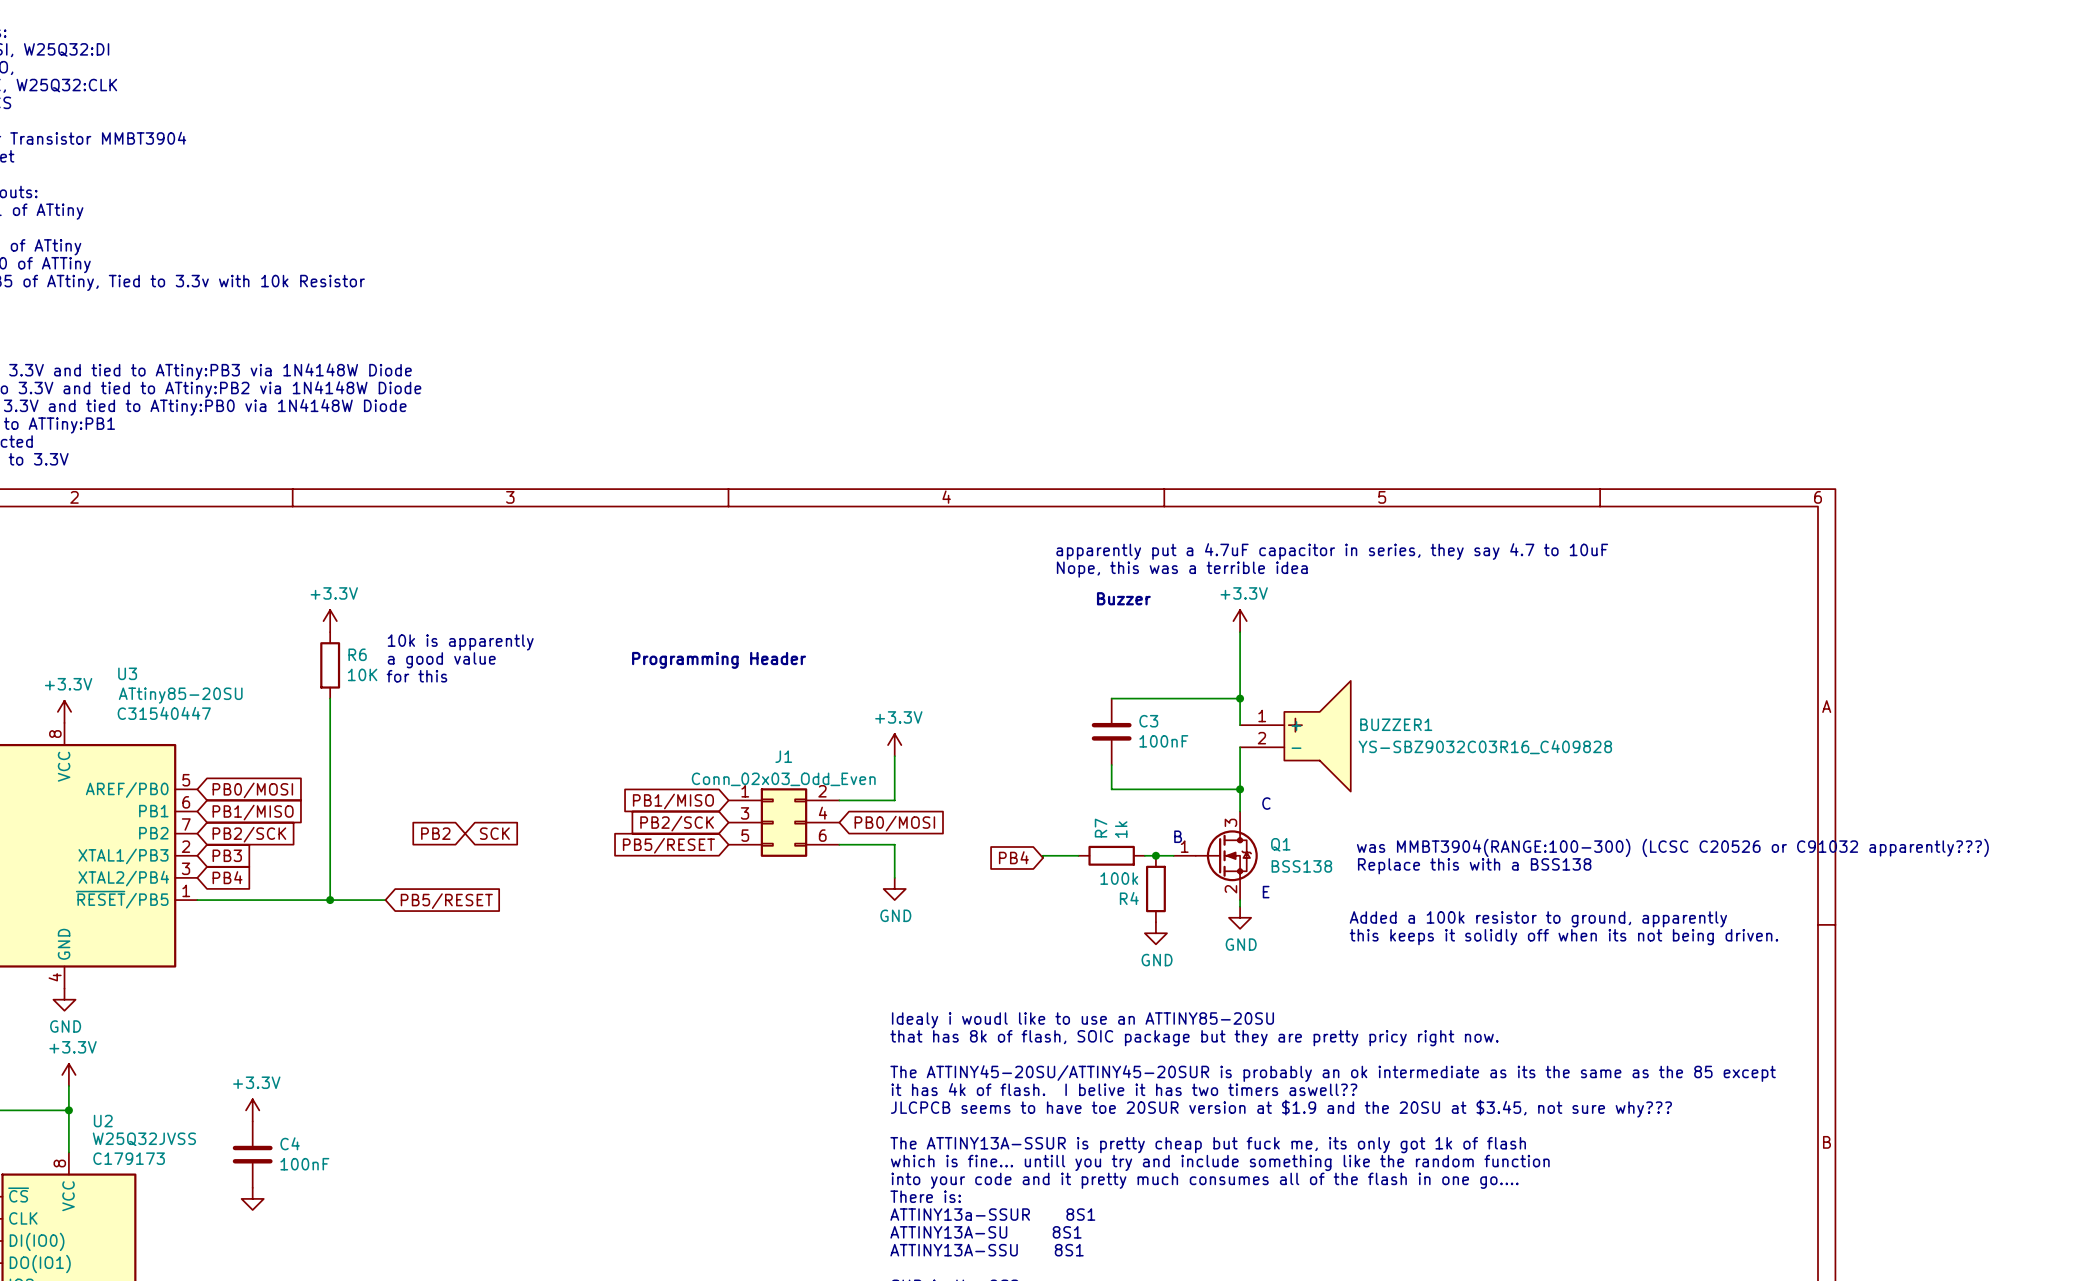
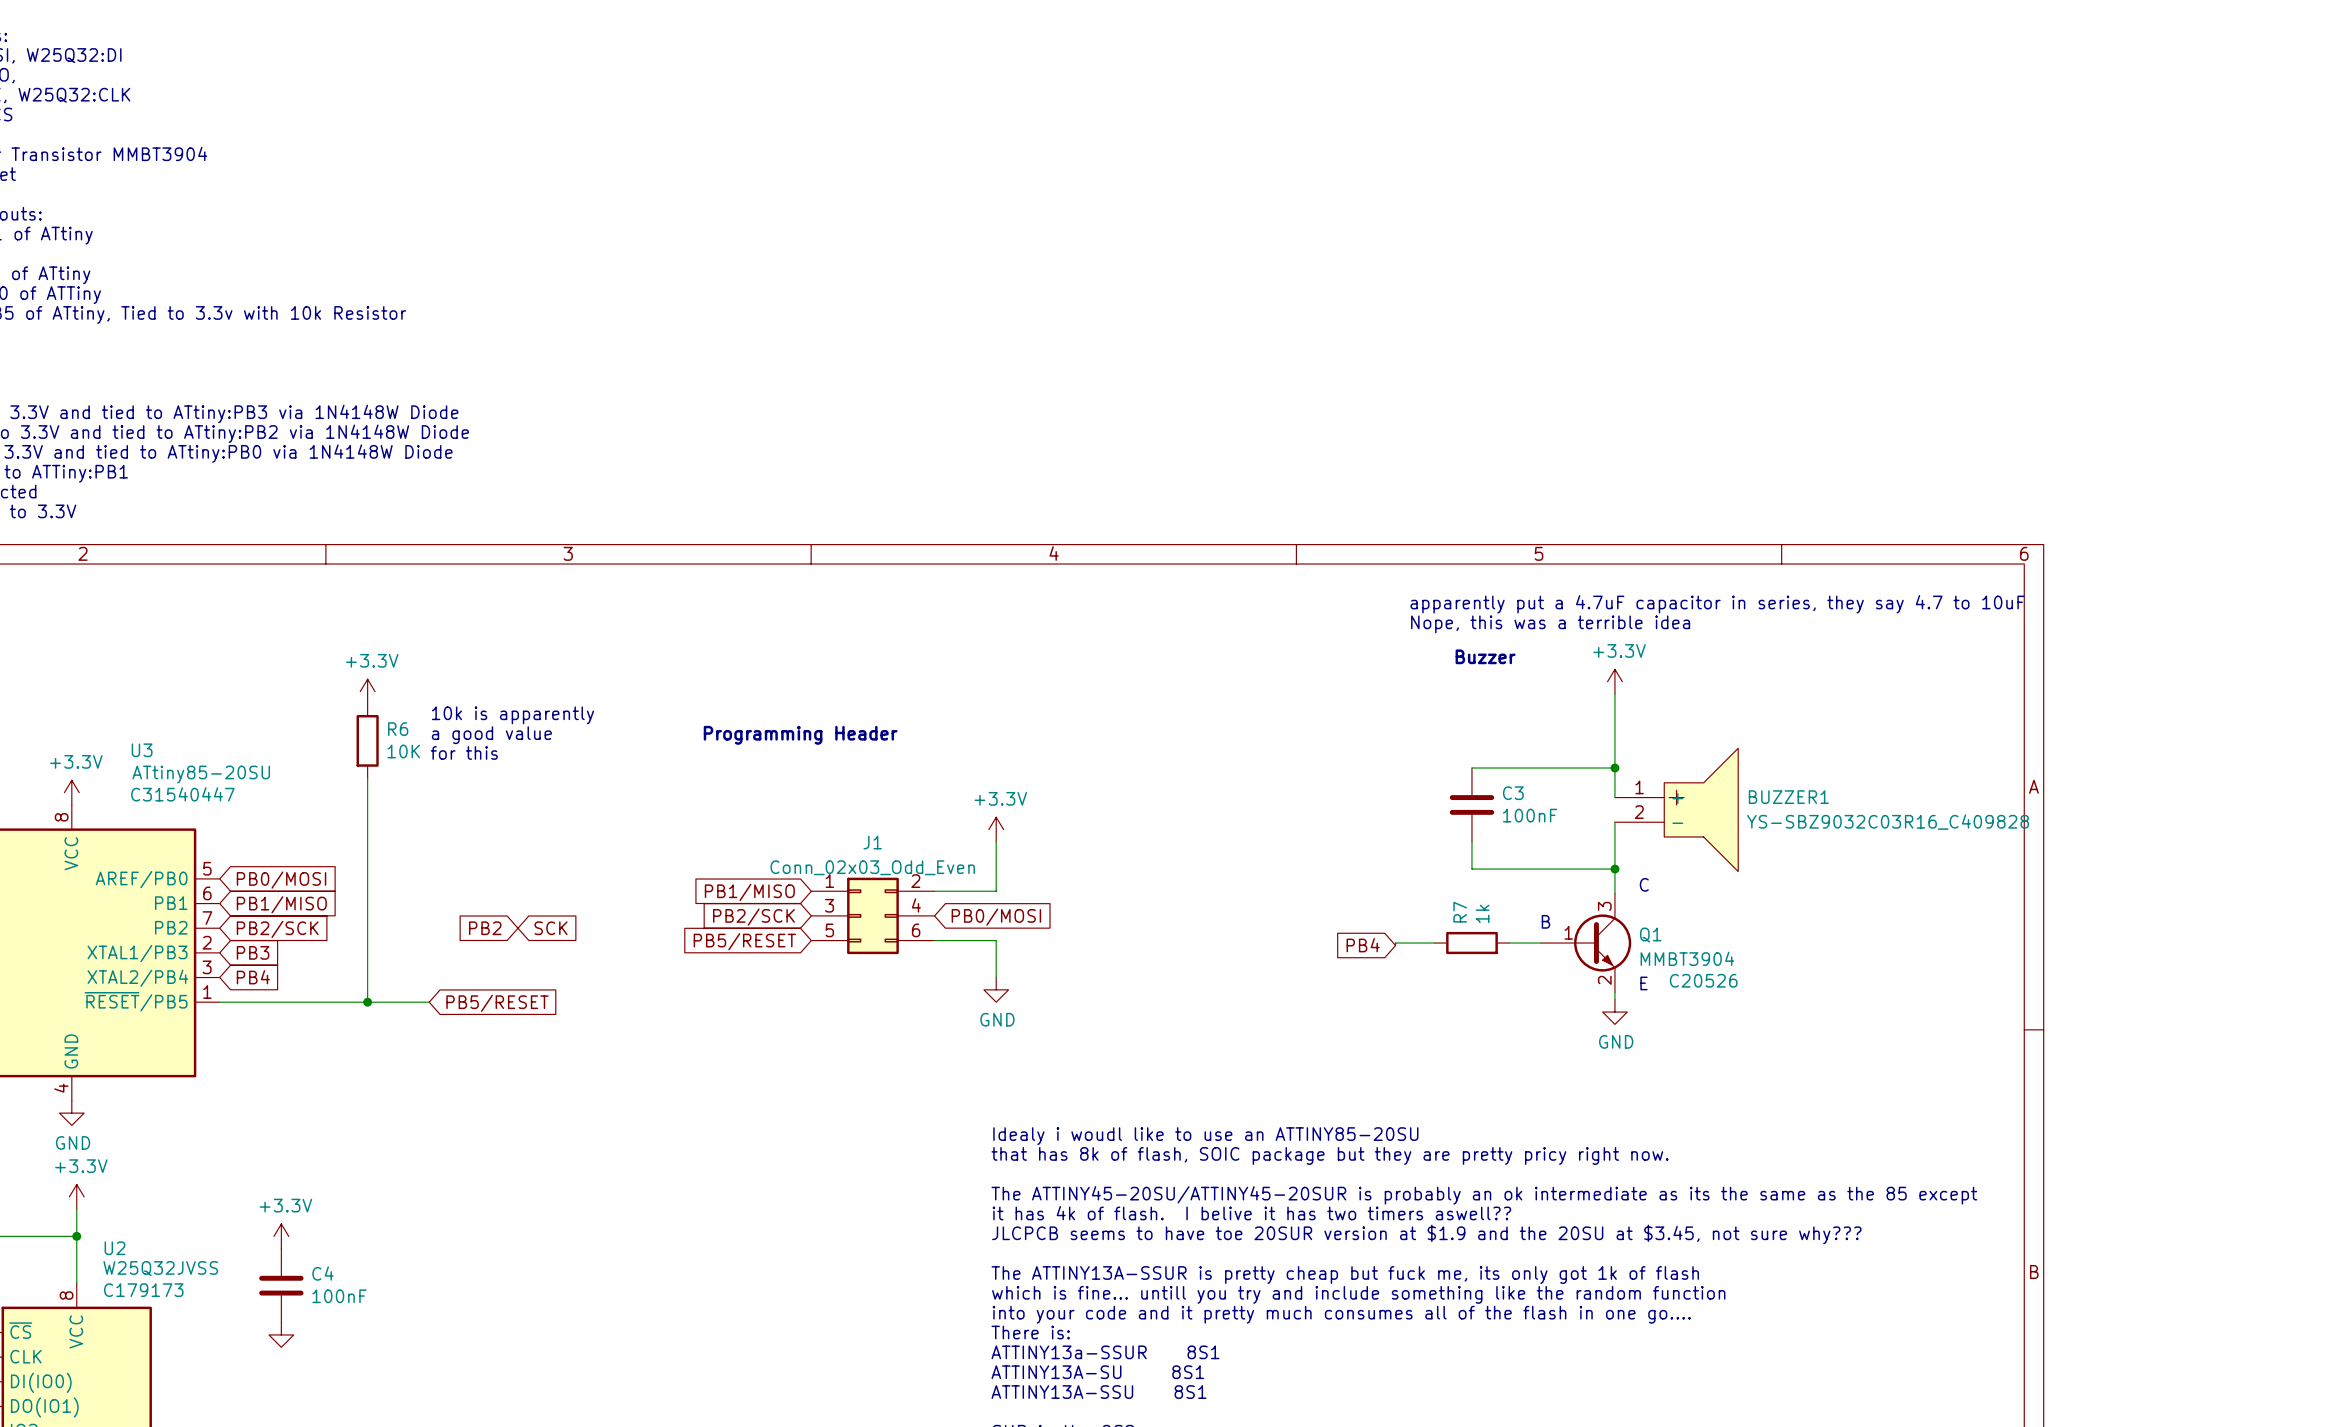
text position: apparently put a 4.7uF capacitor in series, they say 4.7 to 10uF (1332, 551) -> apparently put a 4.7uF capacitor in series, they say 4.7 to 10uF (1717, 604)
text position: Nope, this was a terrible idea (1182, 569) -> Nope, this was a terrible idea (1550, 624)
text position: Buzzer (1123, 598) -> Buzzer (1485, 656)
power symbol position: +3.3V (1240, 621) -> +3.3V (1614, 681)
wire: (1240, 632) (1240, 725) -> (1614, 694) (1614, 797)
junction: none -> (1614, 768)
wire: (1111, 698) (1240, 698) -> (1471, 768) (1614, 768)
junction: (1240, 698) -> none
C3 position: (1111, 731) -> (1471, 804)
BUZZER1 position: (1295, 736) -> (1676, 809)
wire: (1240, 747) (1240, 811) -> (1614, 822) (1614, 893)
wire: (1111, 765) (1111, 789) (1240, 789) -> (1471, 841) (1471, 869) (1614, 869)
junction: none -> (1614, 869)
junction: (1240, 789) -> none
text position: C (1266, 803) -> C (1644, 884)
Q1 symbol: [1173, 811, 1258, 901] -> [1541, 893, 1632, 993]
text position: B (1178, 836) -> B (1545, 921)
text: was MMBT3904(RANGE:100-300) (LCSC C20526 or C91032 apparently???) (1672, 847) -> none
wire: (1078, 855) (1043, 855) (1043, 857) -> (1435, 943) (1395, 943) (1395, 945)
R7 position: (1111, 855) -> (1471, 943)
wire: (1144, 855) (1173, 855) -> (1508, 943) (1541, 943)
junction: (1155, 855) -> none
global label position: PB4 (1013, 857) -> PB4 (1363, 945)
Q1 value: BSS138 (1301, 866) -> MMBT3904 (1687, 958)
text: Replace this with a BSS138 (1474, 866) -> none
Q1 text: none -> C20526 (1703, 980)
R4: 100k (1155, 888) -> none
text position: E (1266, 892) -> E (1643, 983)
wire: (1240, 900) (1240, 906) -> (1614, 992) (1614, 999)
power symbol: none -> GND (1614, 1012)
power symbol: GND (1240, 917) -> none
text: Added a 100k resistor to ground, apparently (1538, 919) -> none
power symbol: GND (1155, 933) -> none
text: this keeps it solidly off when its not being driven. (1563, 937) -> none

